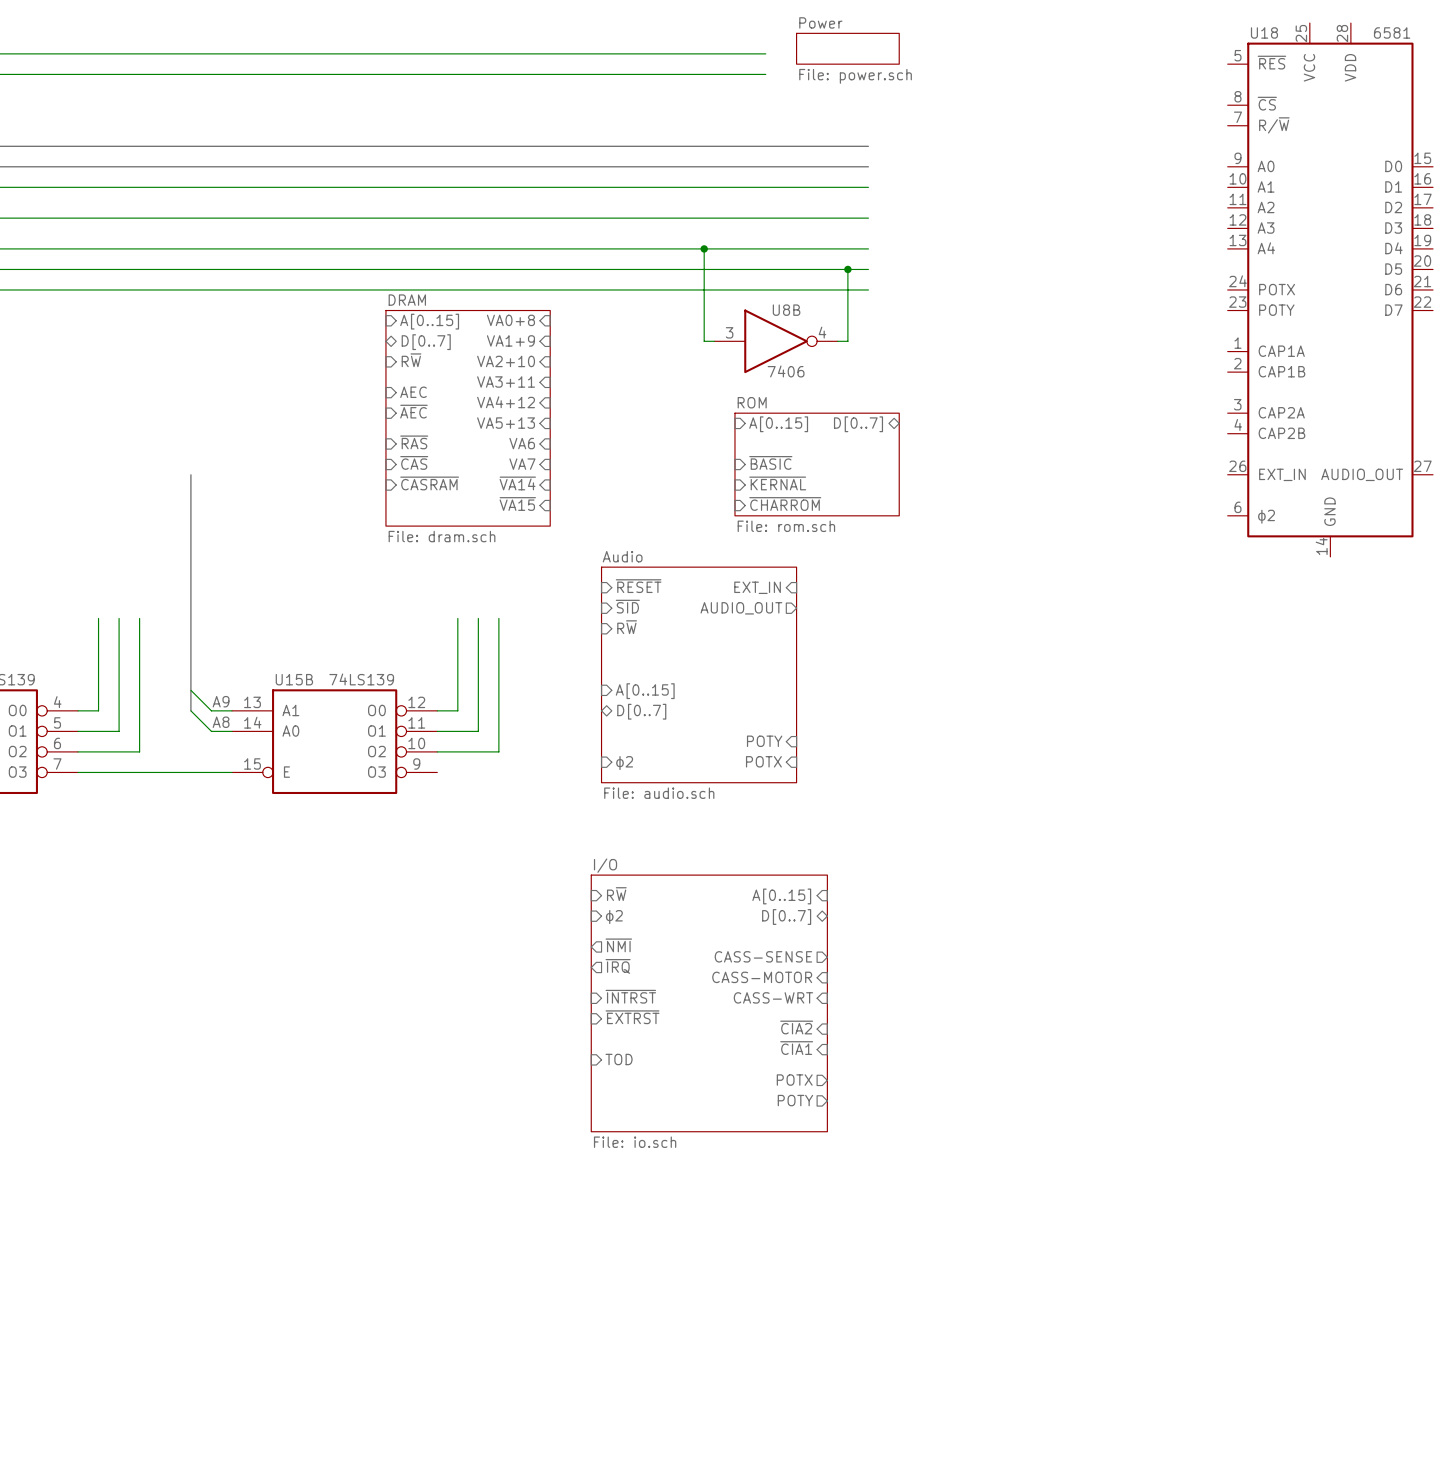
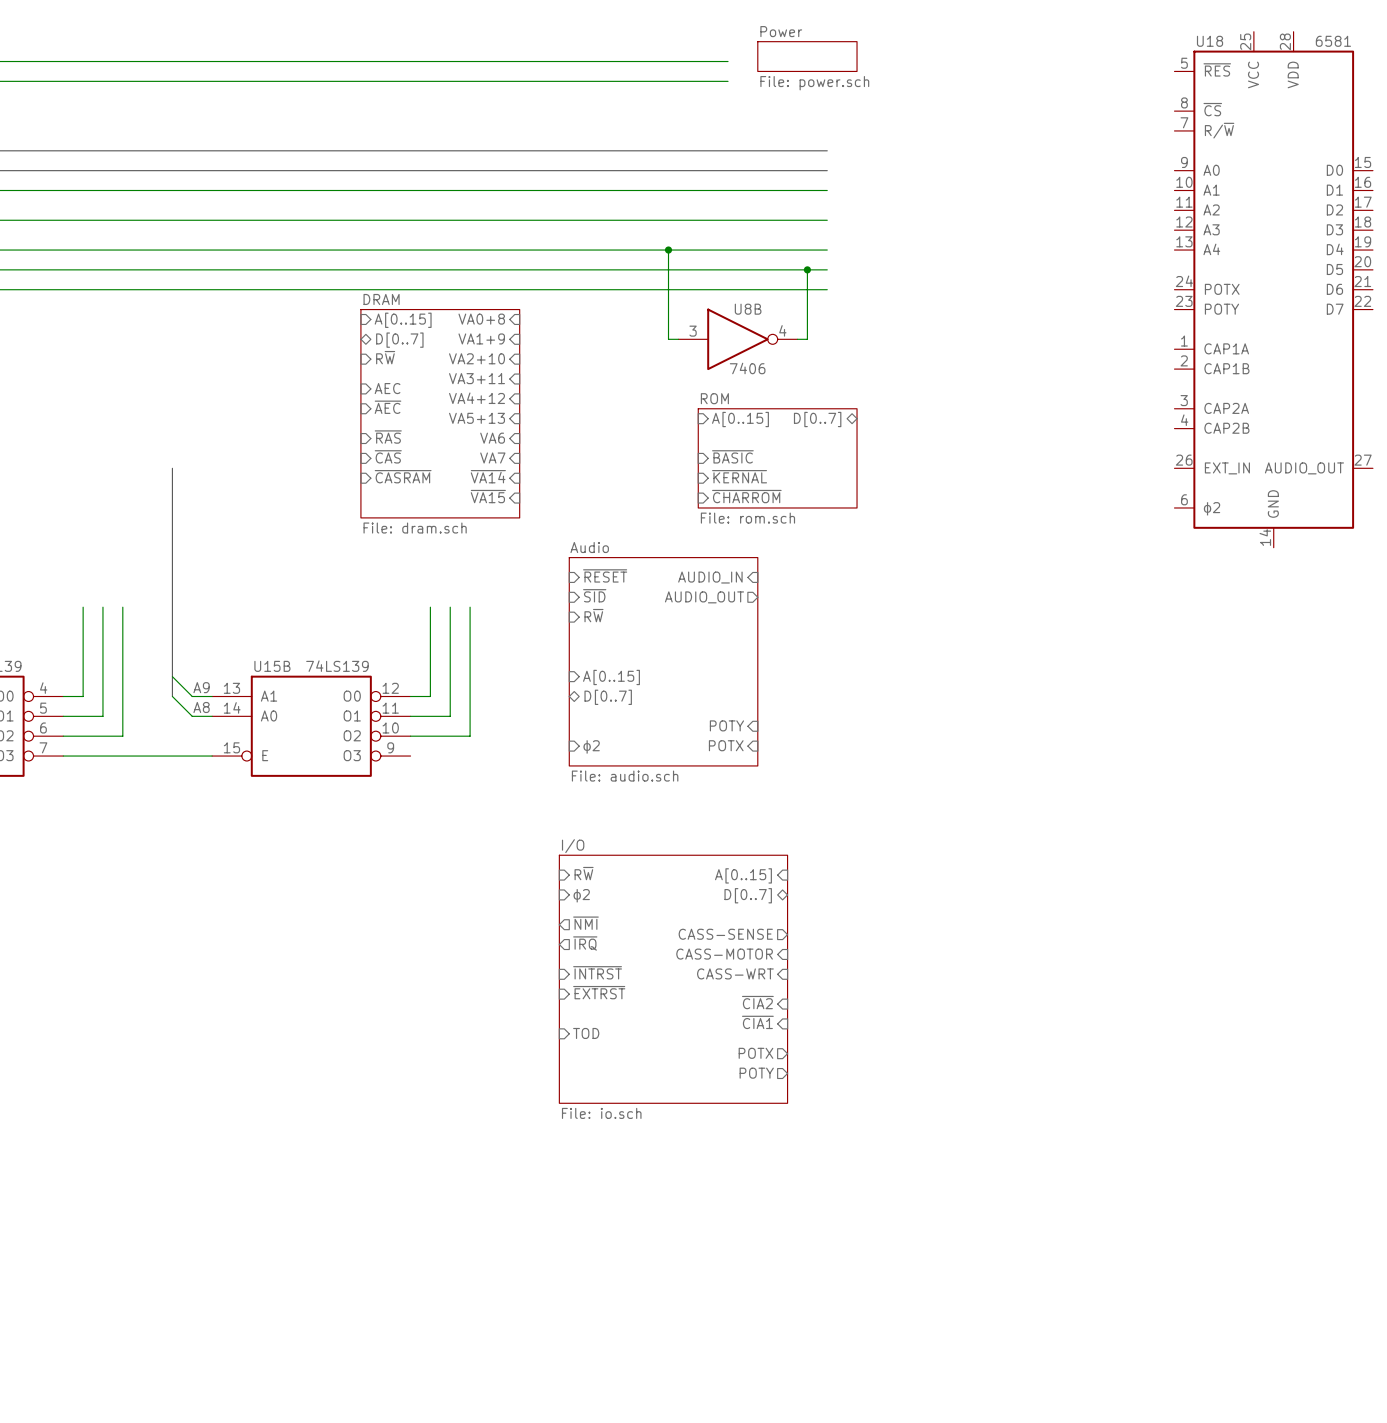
sheet pin: EXT_IN (757, 587) -> AUDIO_IN (710, 577)

